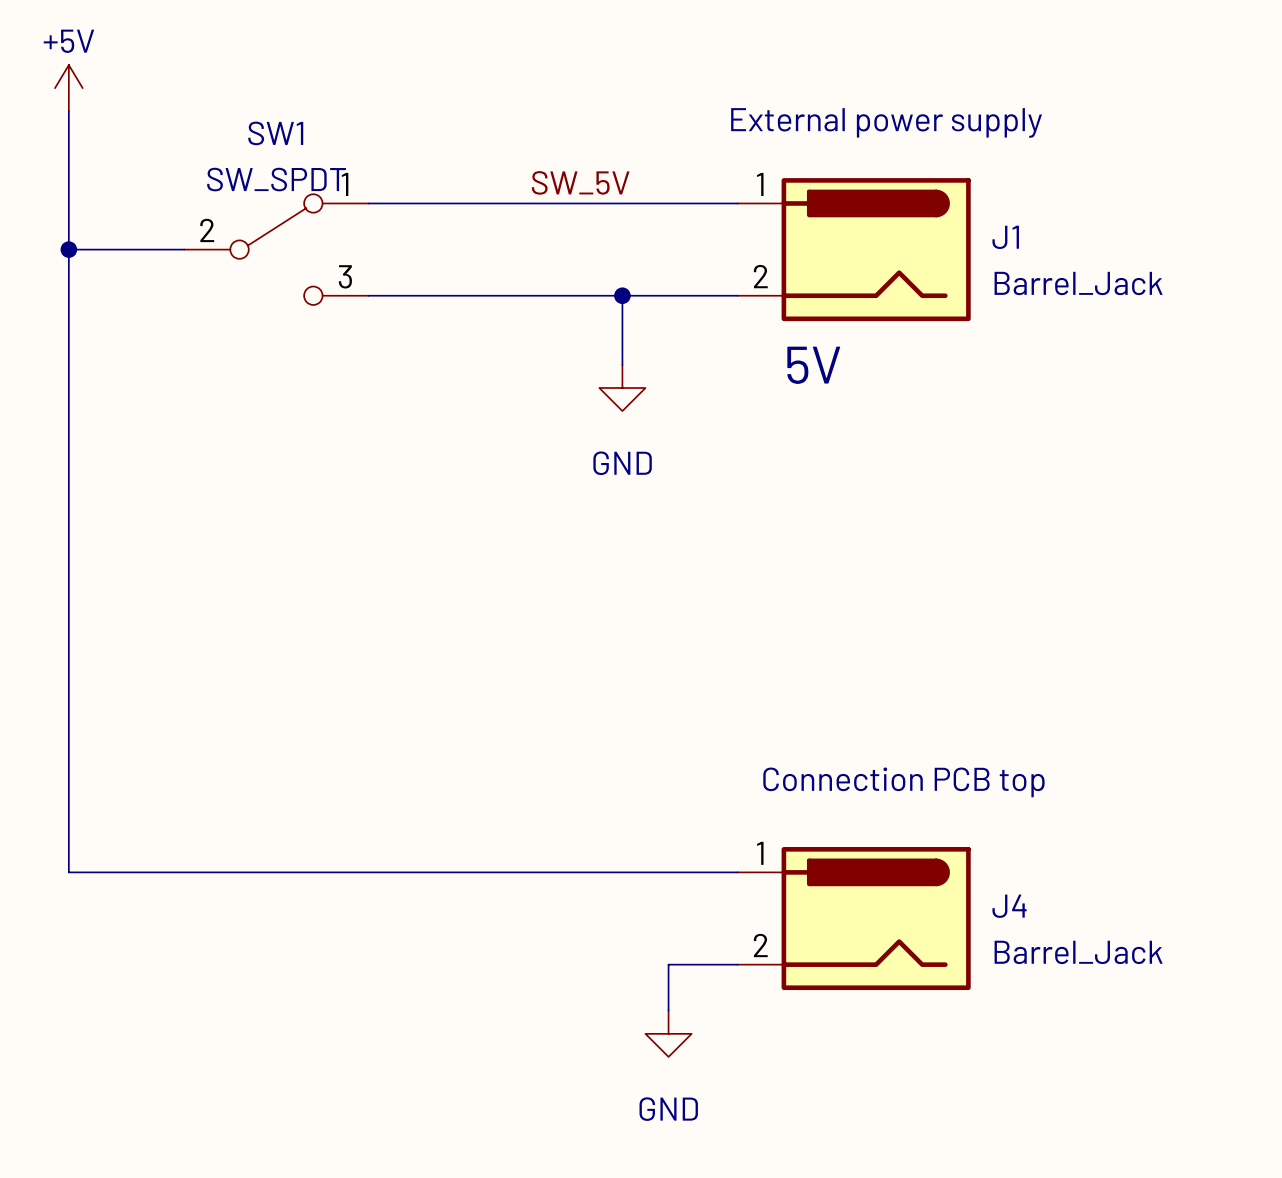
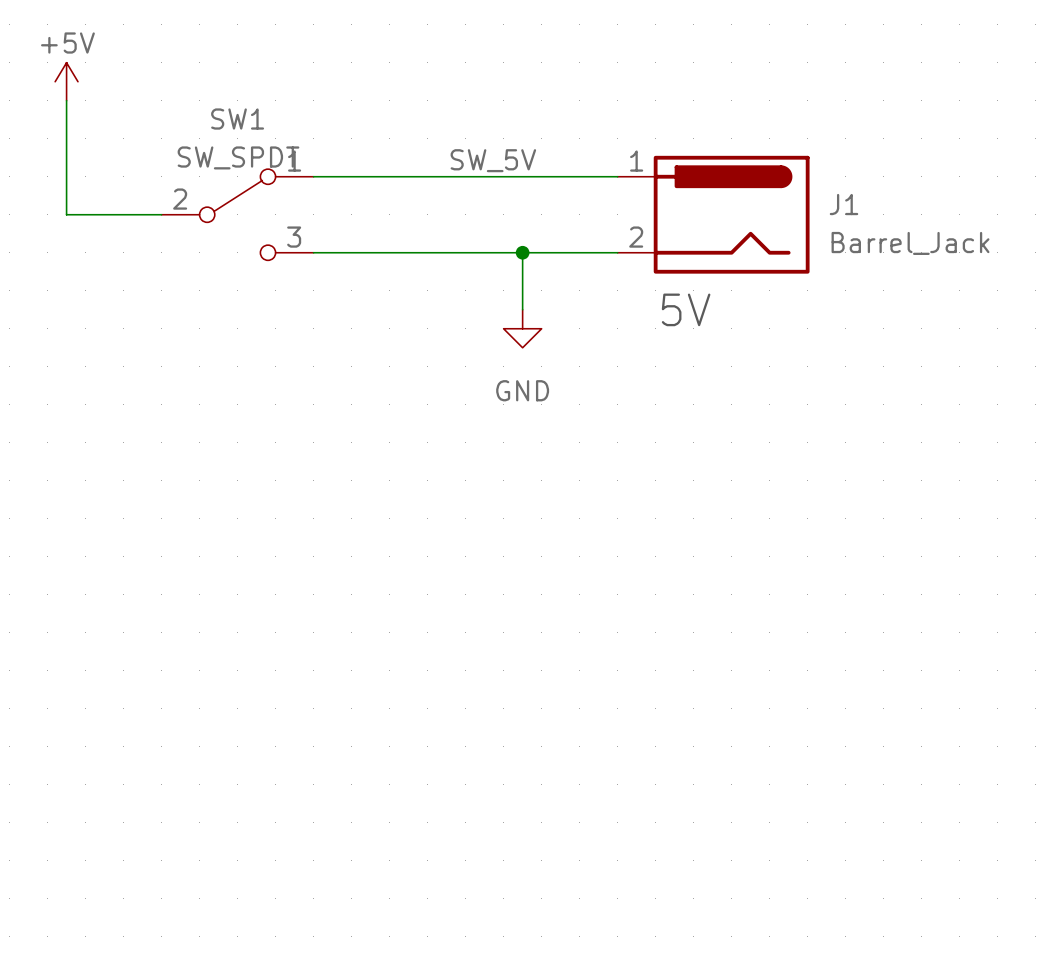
text: External power supply (886, 122) -> none
wire: (68, 249) (68, 872) (737, 872) -> none
junction: (68, 249) -> none
text: Connection PCB top (903, 782) -> none
J4: Barrel_Jack (854, 918) -> none
wire: (737, 964) (668, 964) (668, 1010) -> none
power symbol: GND (668, 1033) -> none

